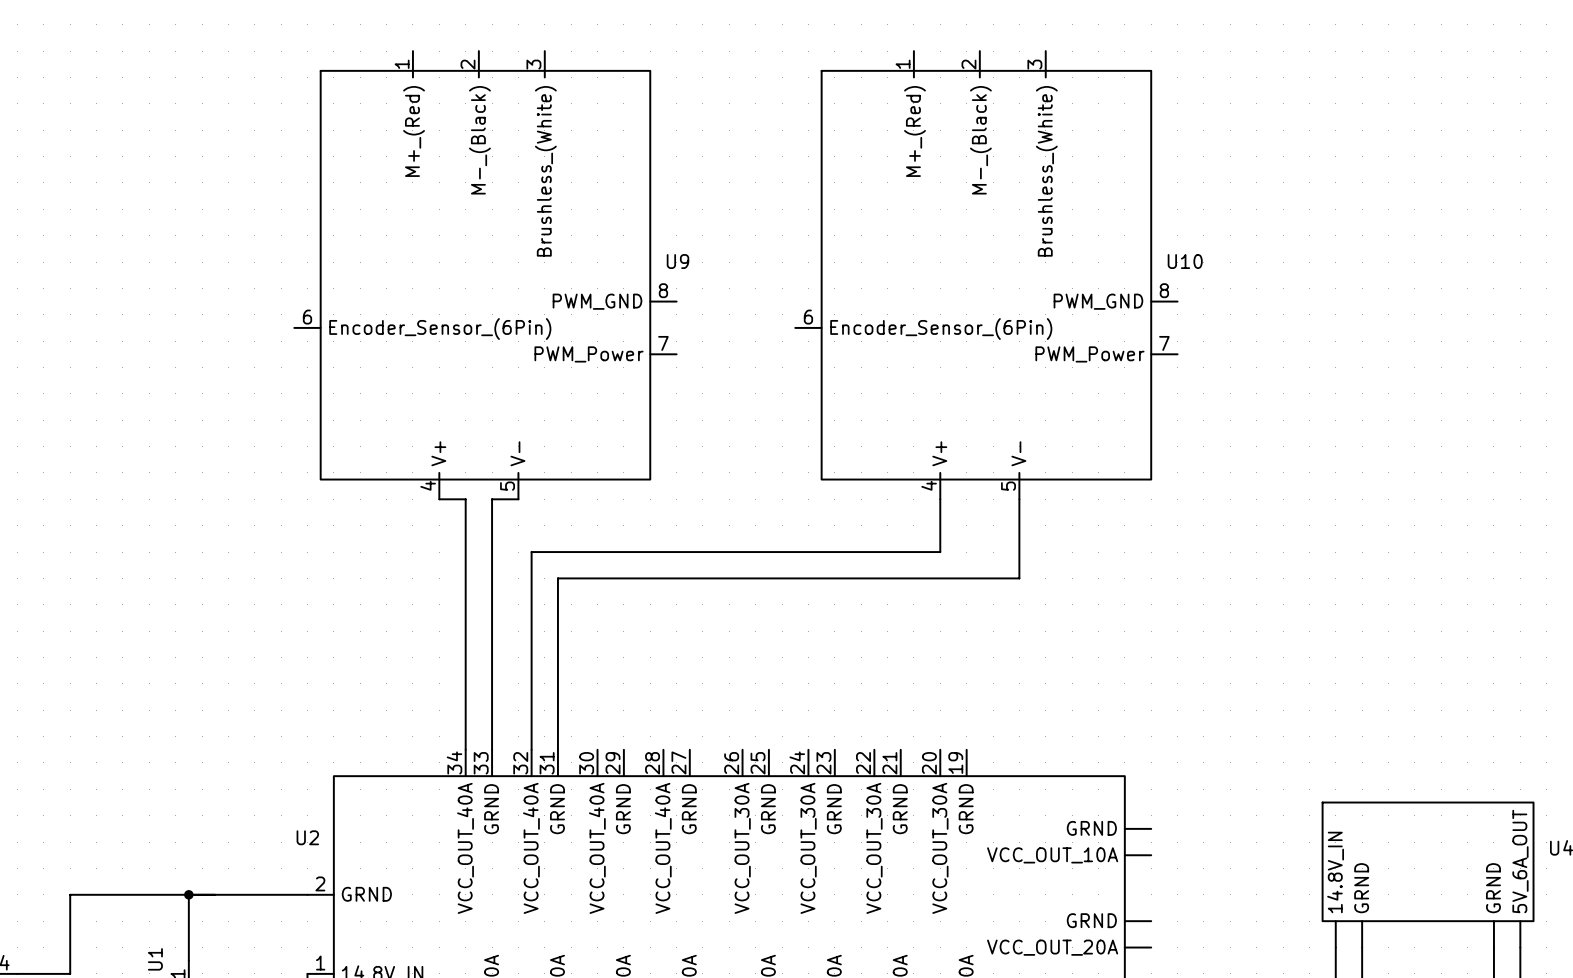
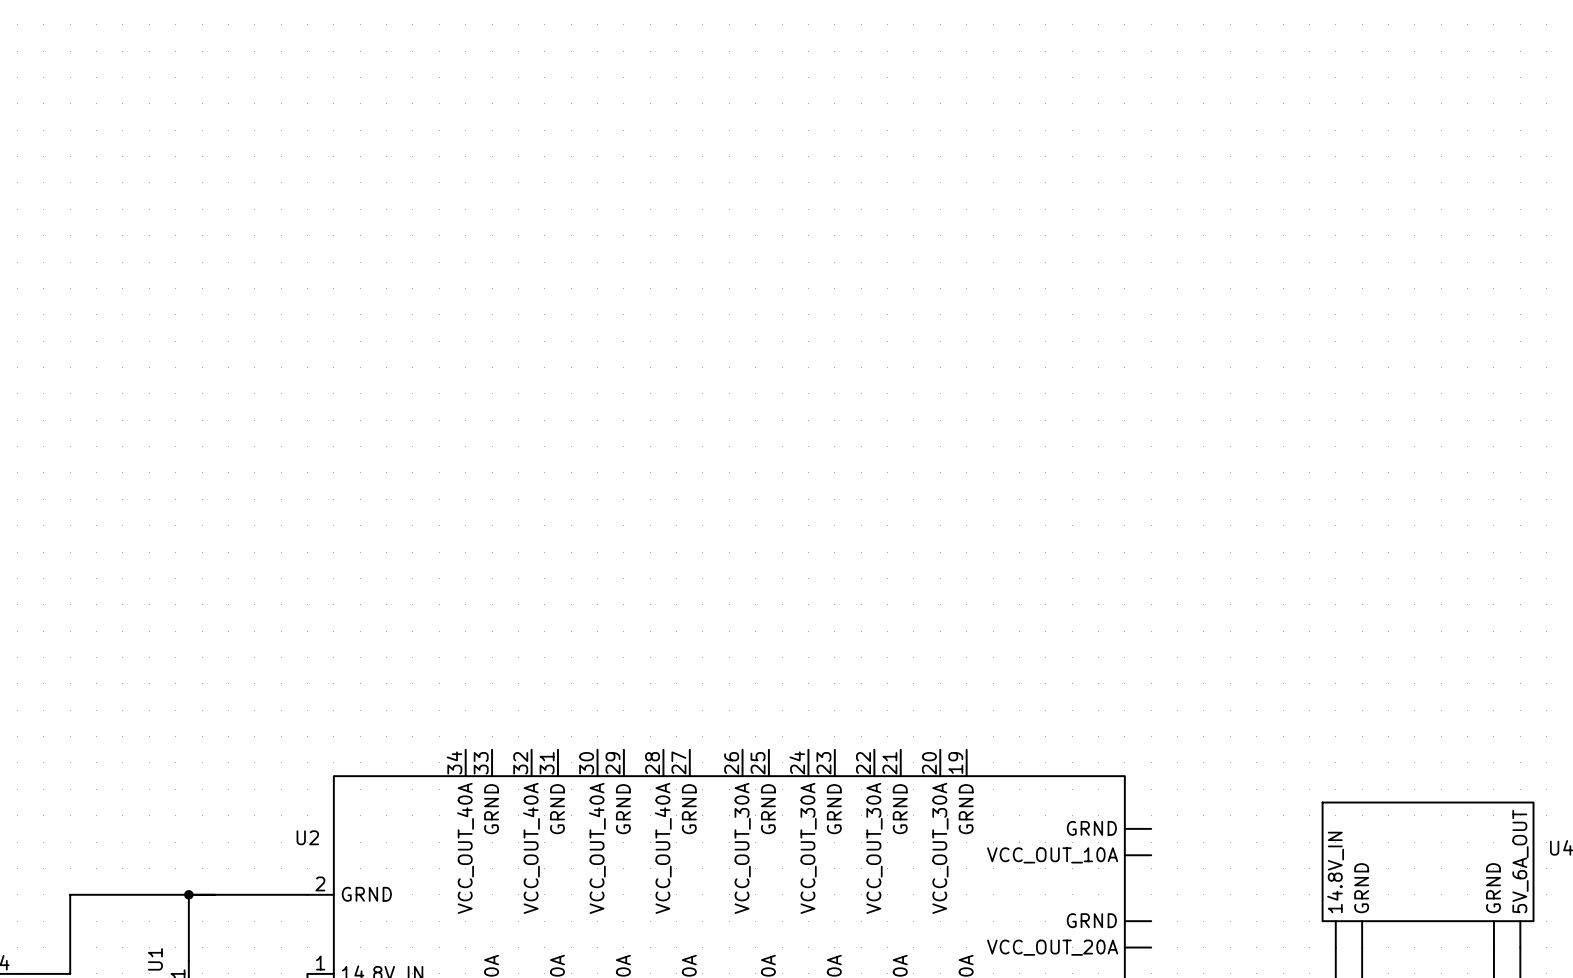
U9: (485, 275) -> none
U10: (986, 275) -> none
wire: (439, 499) (465, 499) (465, 749) -> none
wire: (518, 499) (492, 499) (492, 749) -> none
wire: (940, 499) (940, 552) (531, 552) (531, 749) -> none
wire: (1019, 499) (1019, 578) (557, 578) (557, 749) -> none

